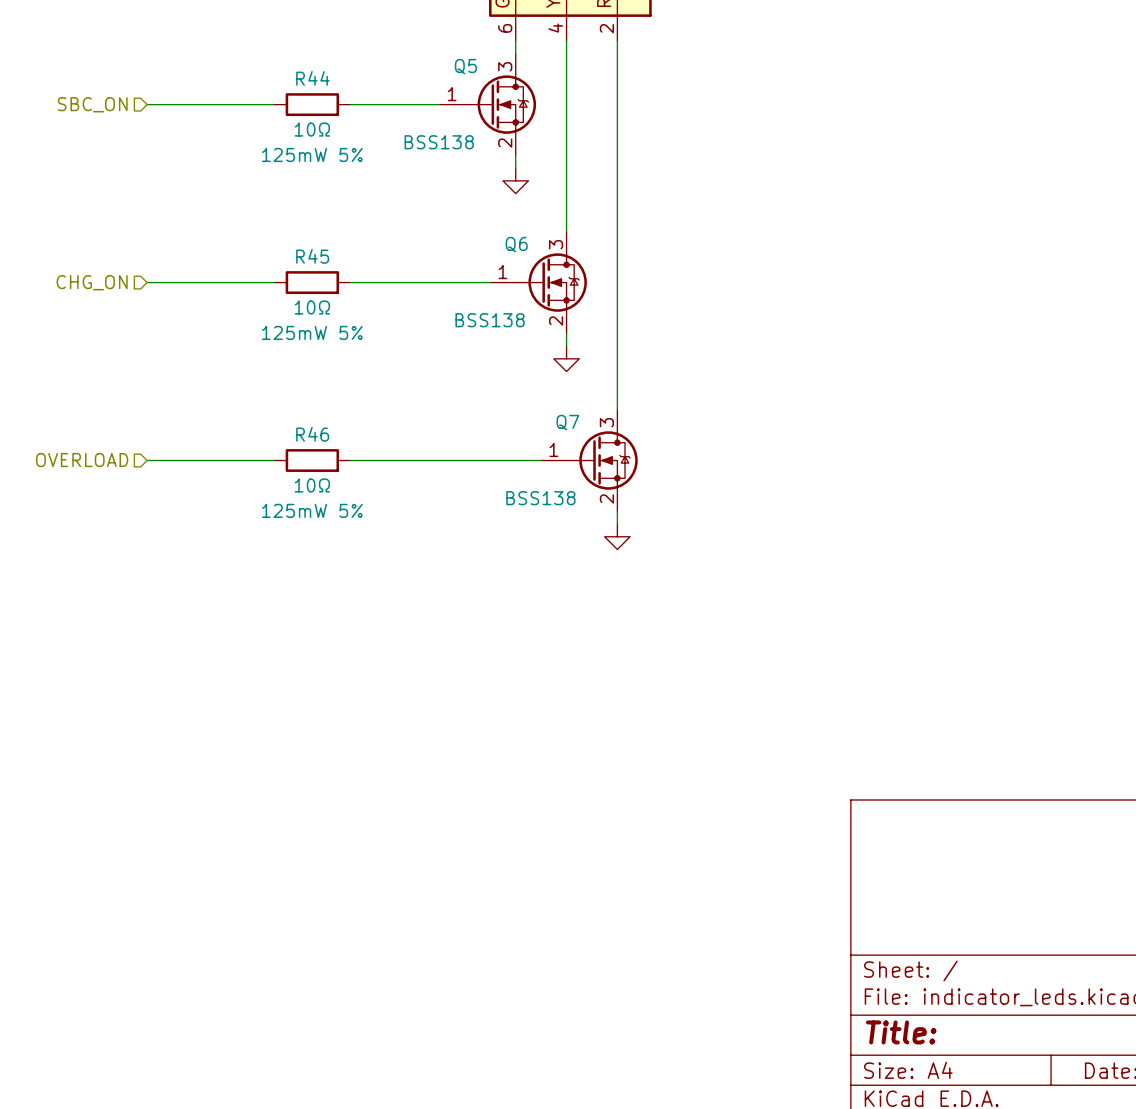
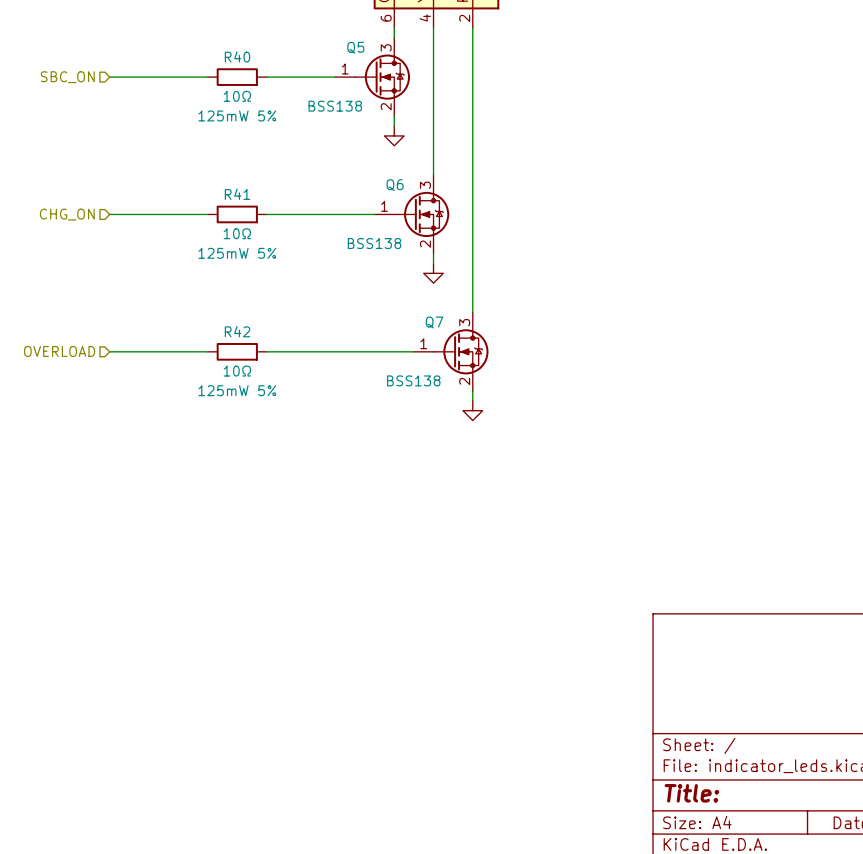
R44 name: R44 (312, 78) -> R40 (237, 56)
R45 name: R45 (312, 256) -> R41 (237, 194)
R46 name: R46 (312, 434) -> R42 (237, 331)

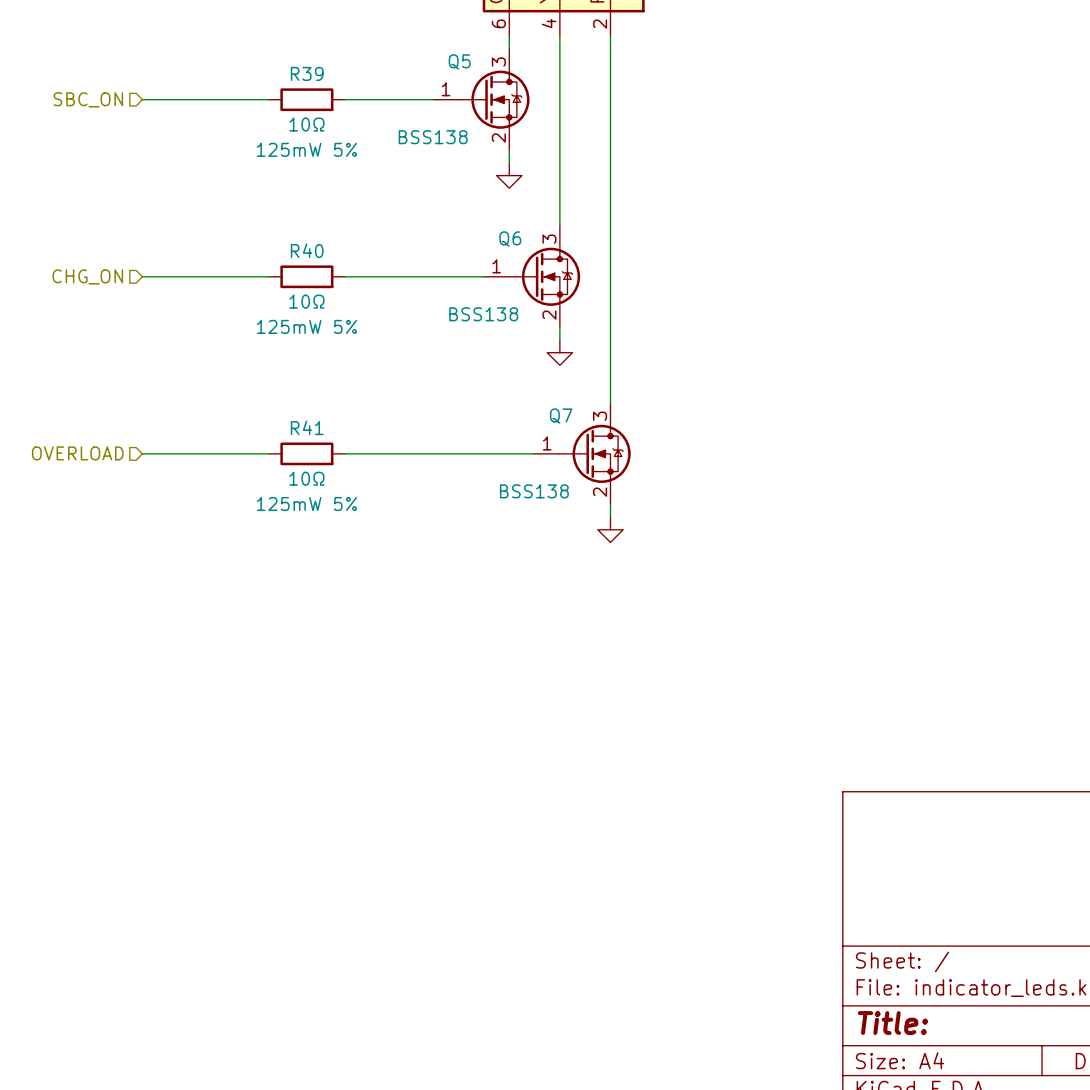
R40 name: R40 (237, 56) -> R39 (307, 73)
R41 name: R41 (237, 194) -> R40 (307, 250)
R42 name: R42 (237, 331) -> R41 (307, 427)

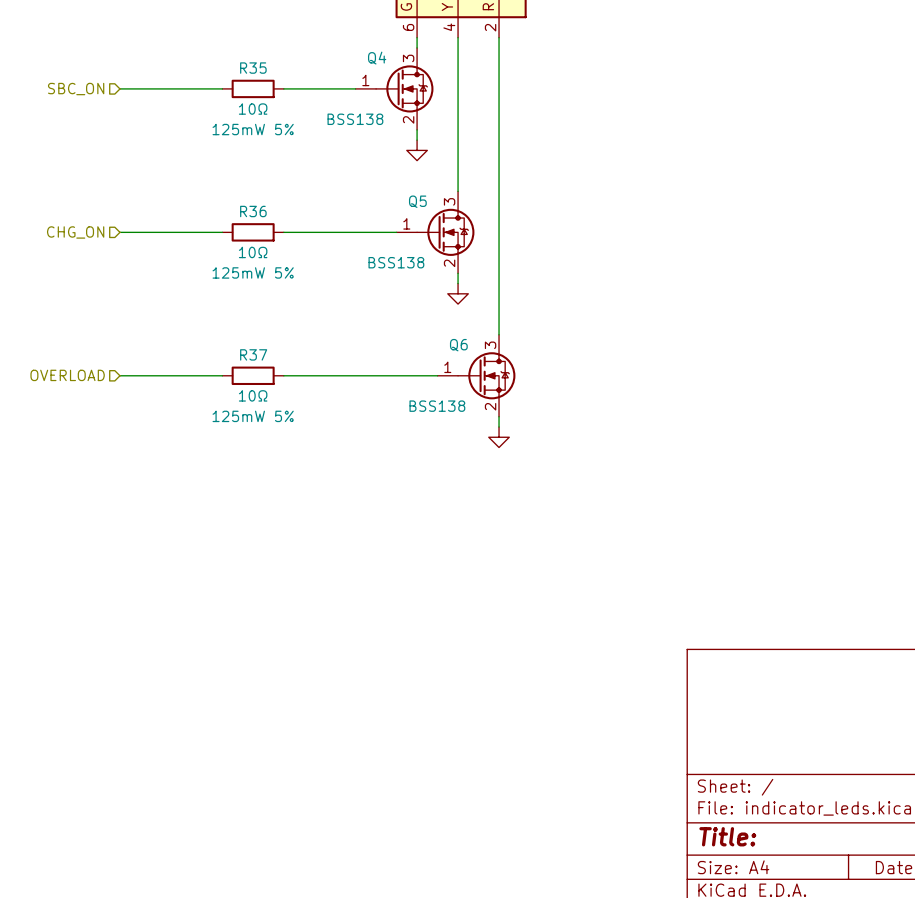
Q5 name: Q5 (459, 61) -> Q4 (377, 58)
R39 name: R39 (307, 73) -> R35 (253, 68)
Q6 name: Q6 (510, 238) -> Q5 (417, 201)
R40 name: R40 (307, 250) -> R36 (253, 211)
Q7 name: Q7 (561, 416) -> Q6 (458, 345)
R41 name: R41 (307, 427) -> R37 (253, 354)

